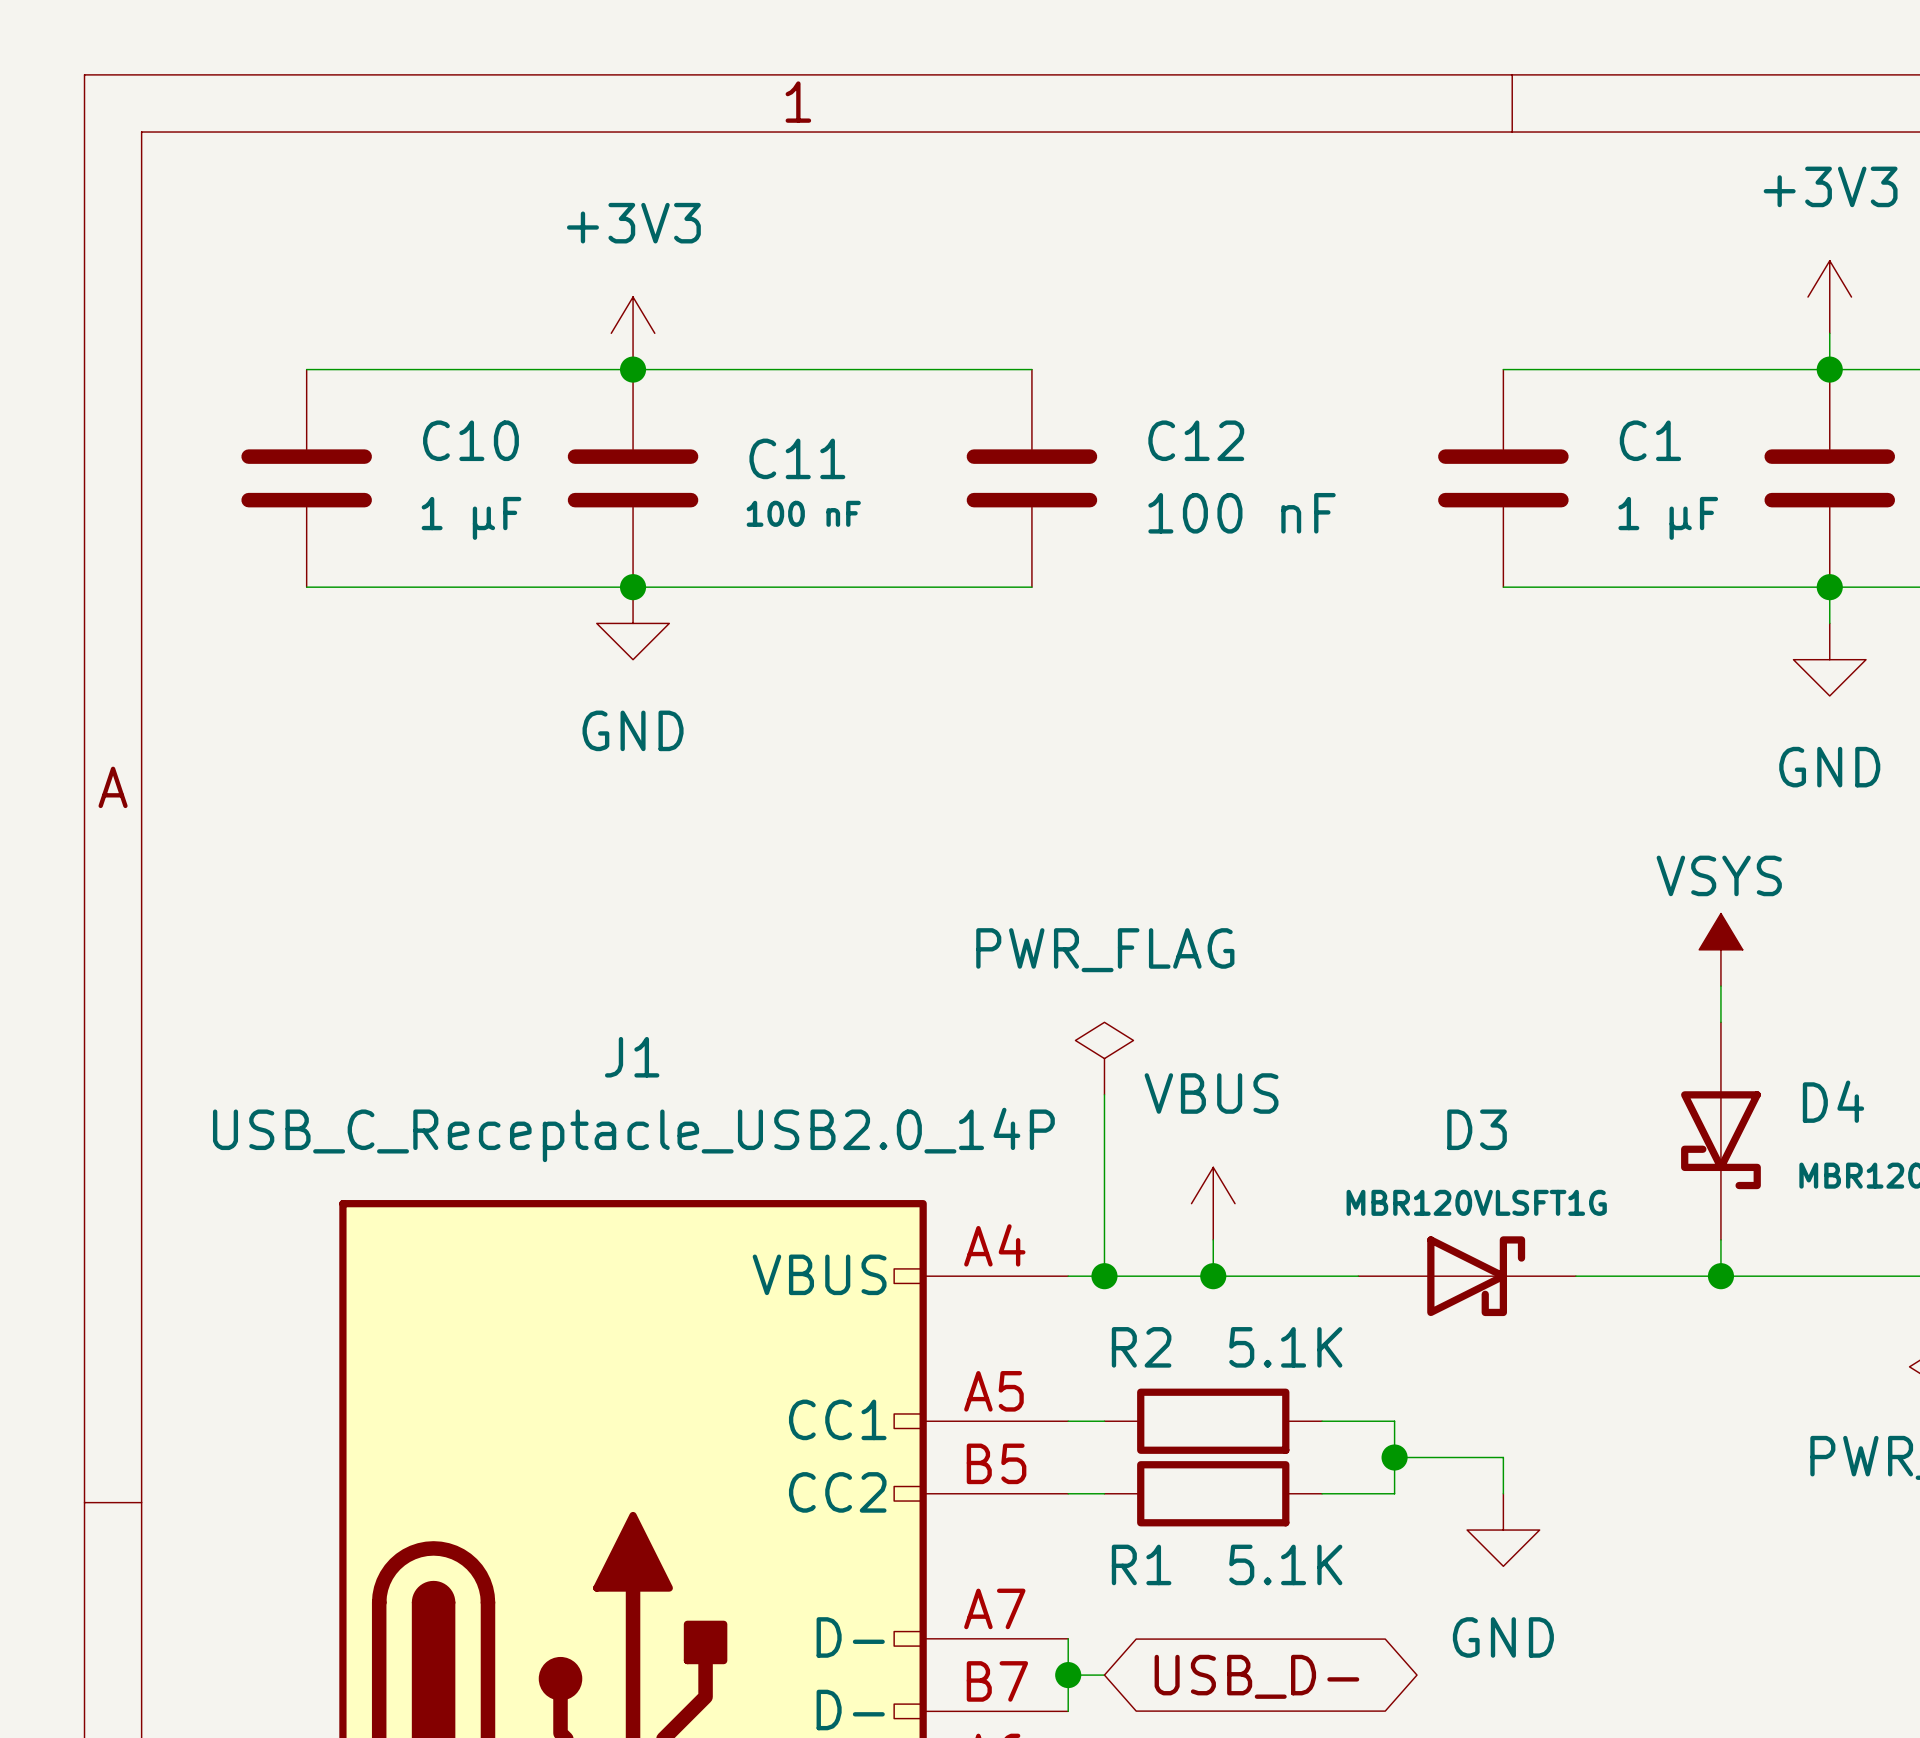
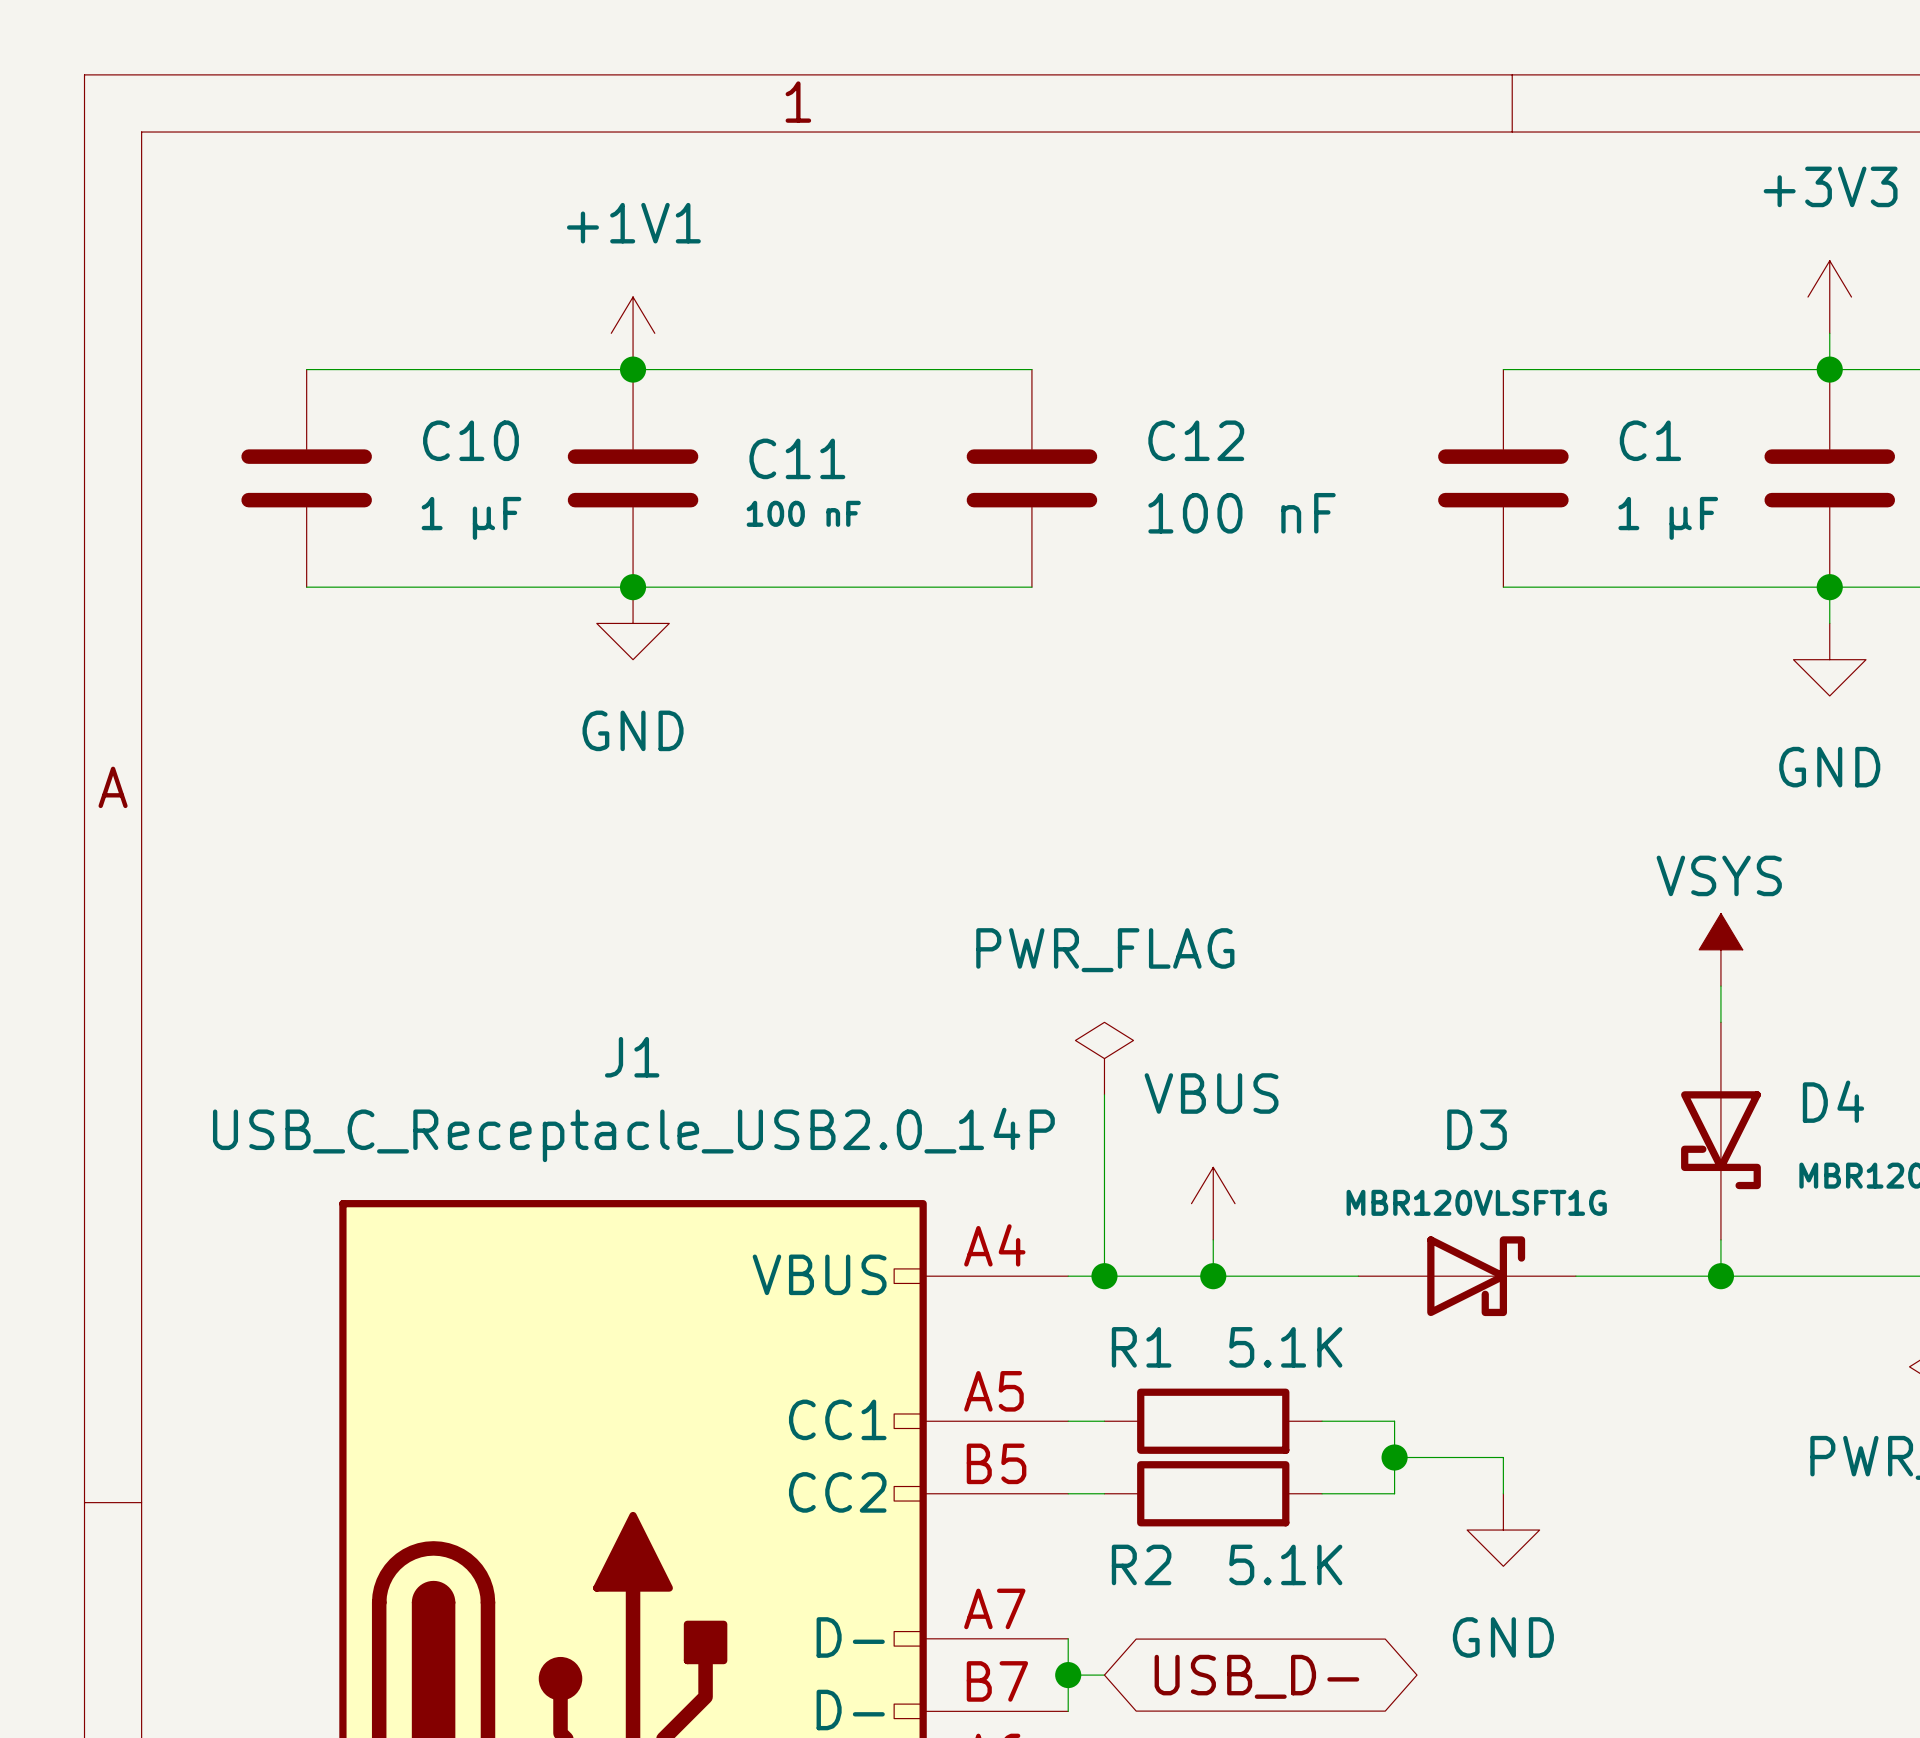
power symbol: +3V3 (633, 333) -> +1V1 (633, 333)
R2 name: R2 (1141, 1347) -> R1 (1141, 1347)
R1 name: R1 (1141, 1564) -> R2 (1141, 1564)

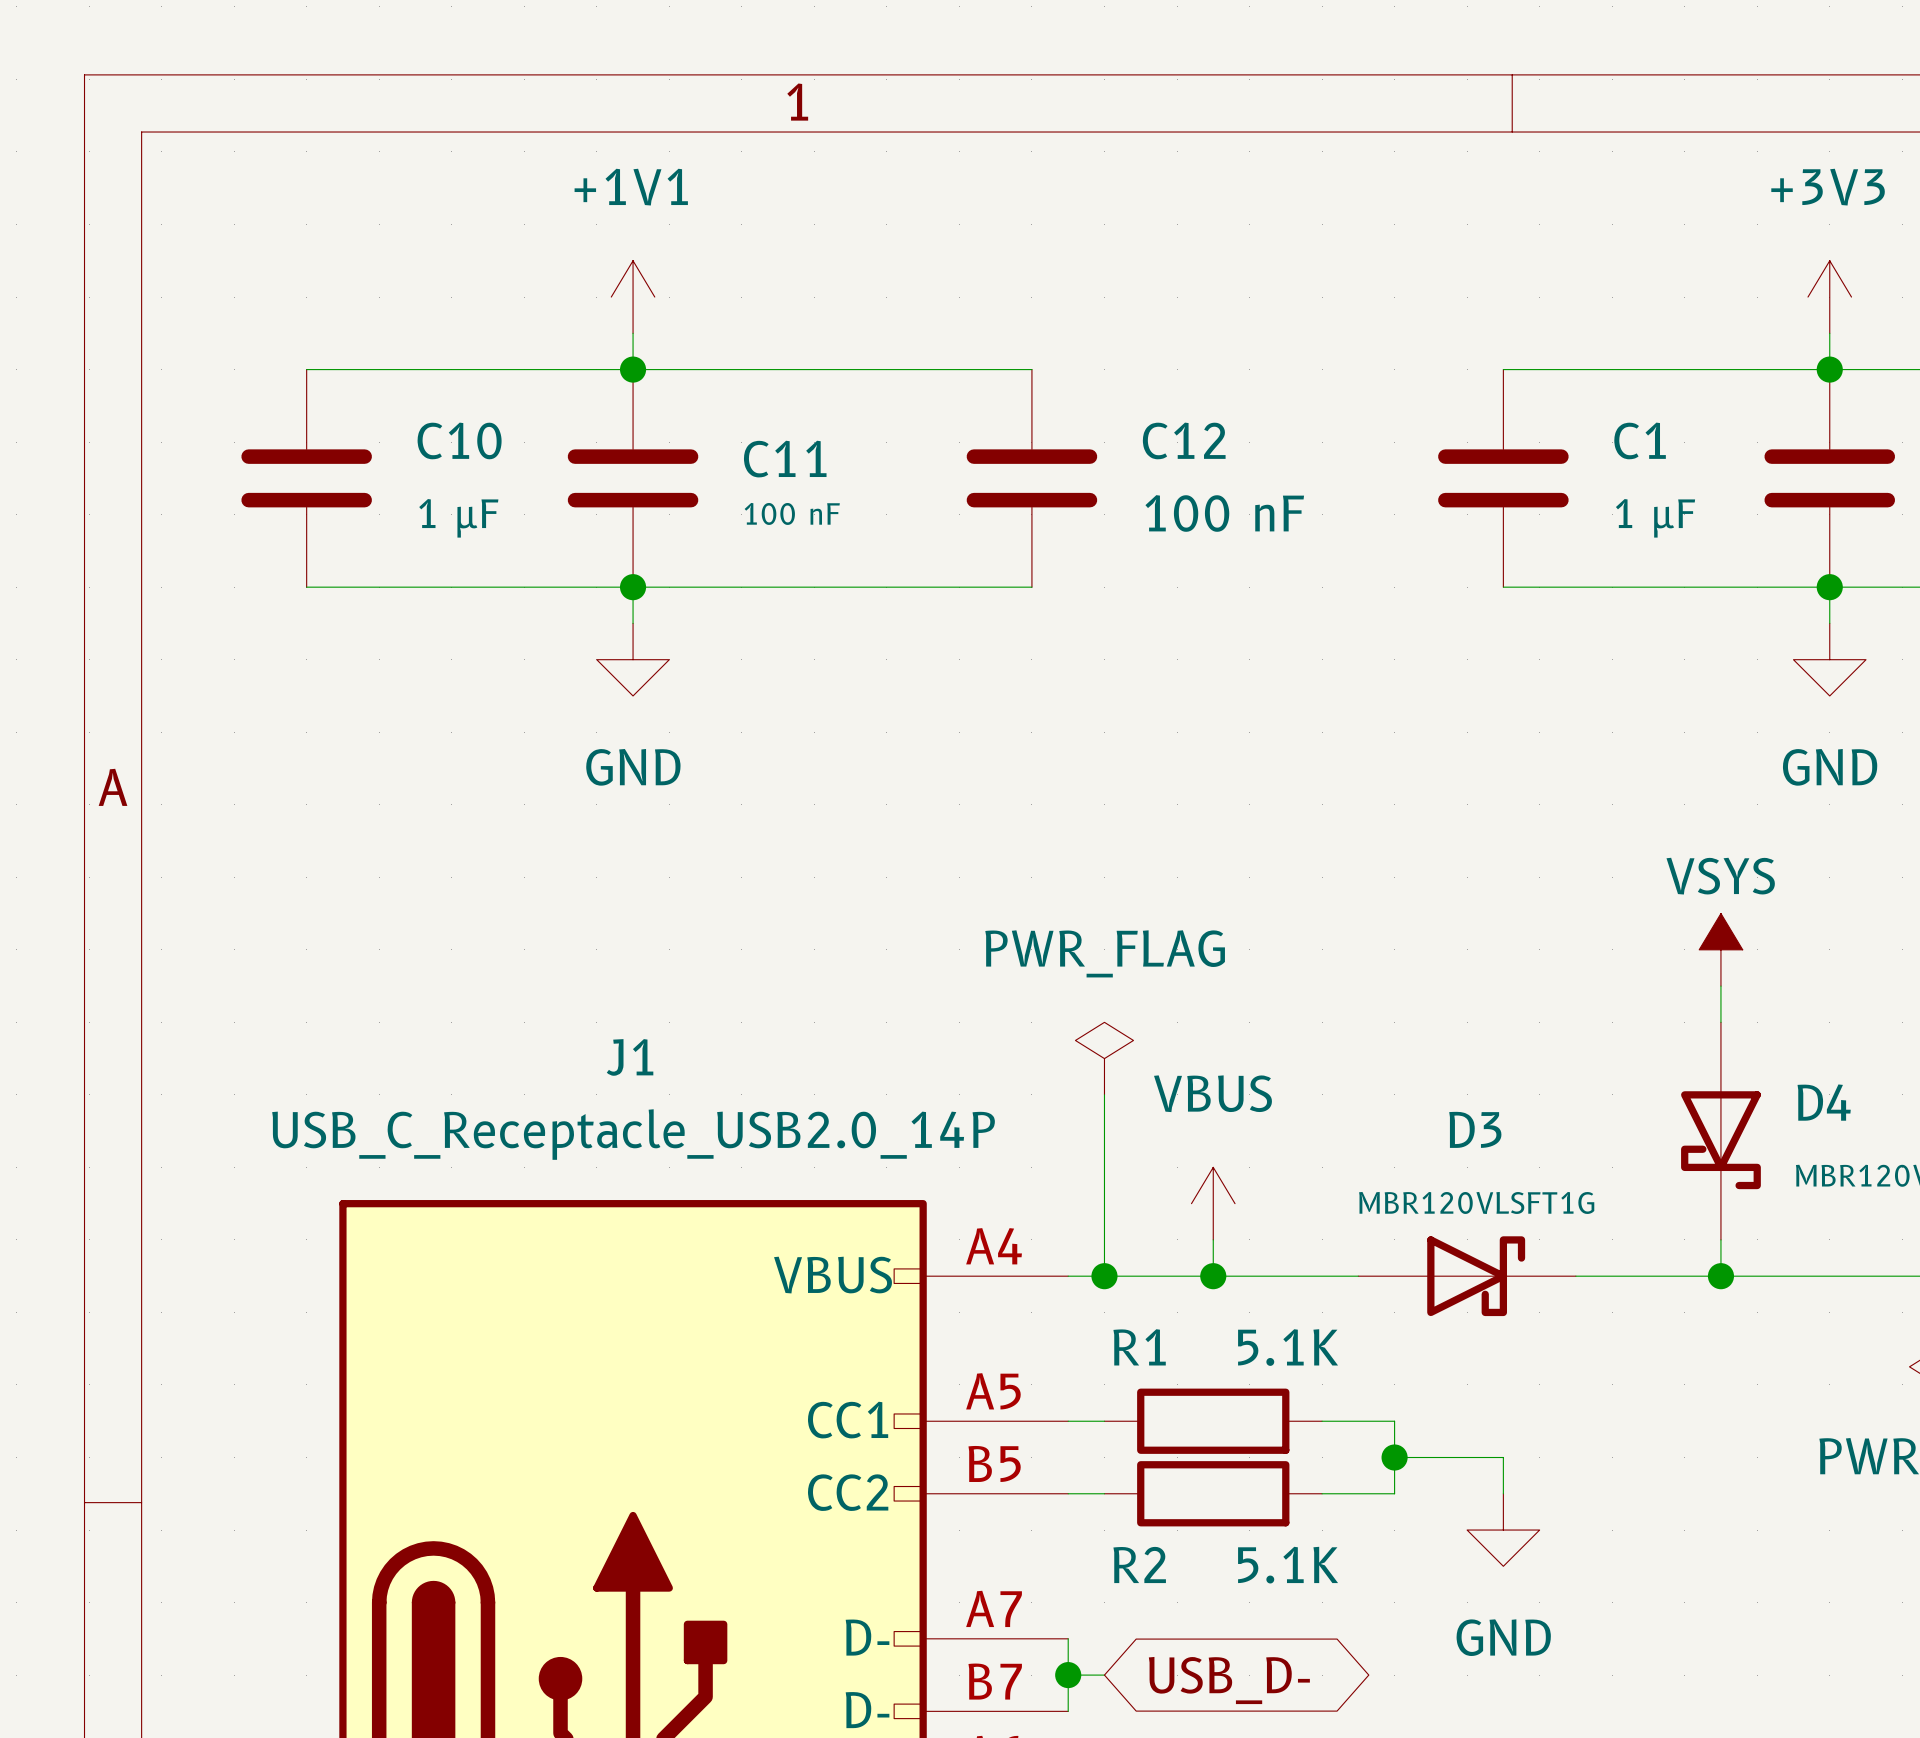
power symbol position: +1V1 (633, 333) -> +1V1 (633, 297)
power symbol position: GND (633, 623) -> GND (633, 659)

